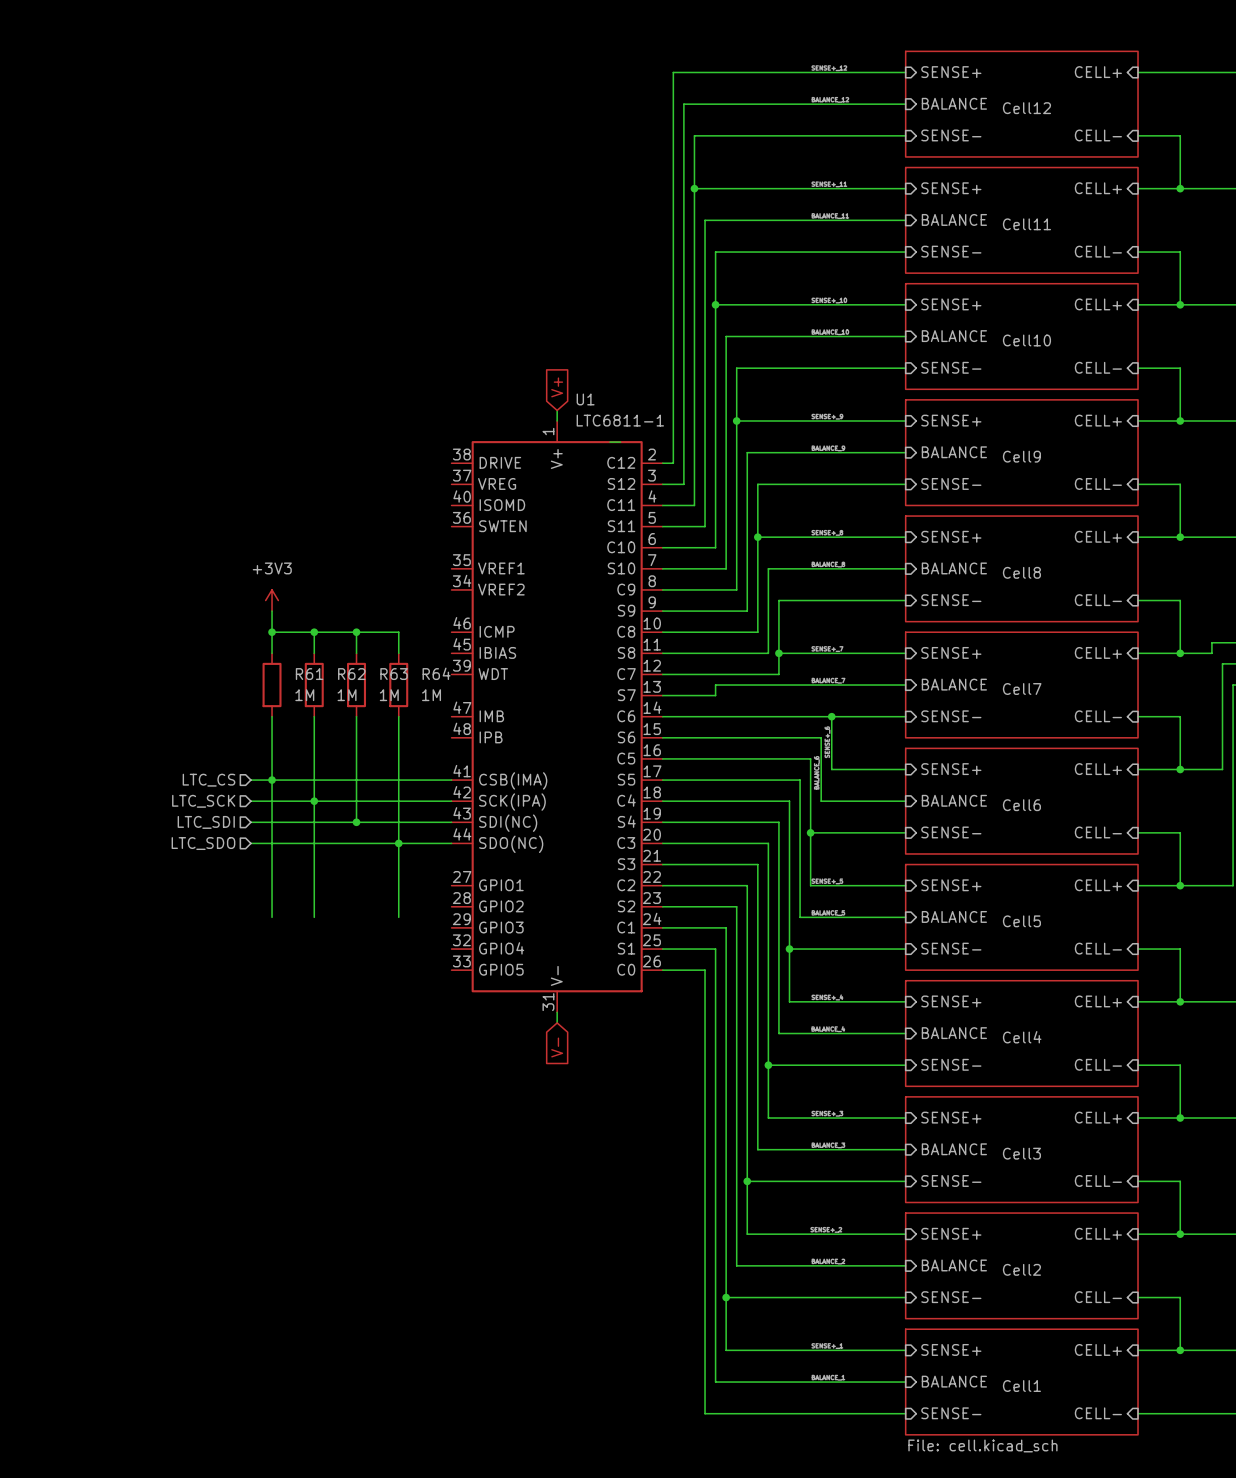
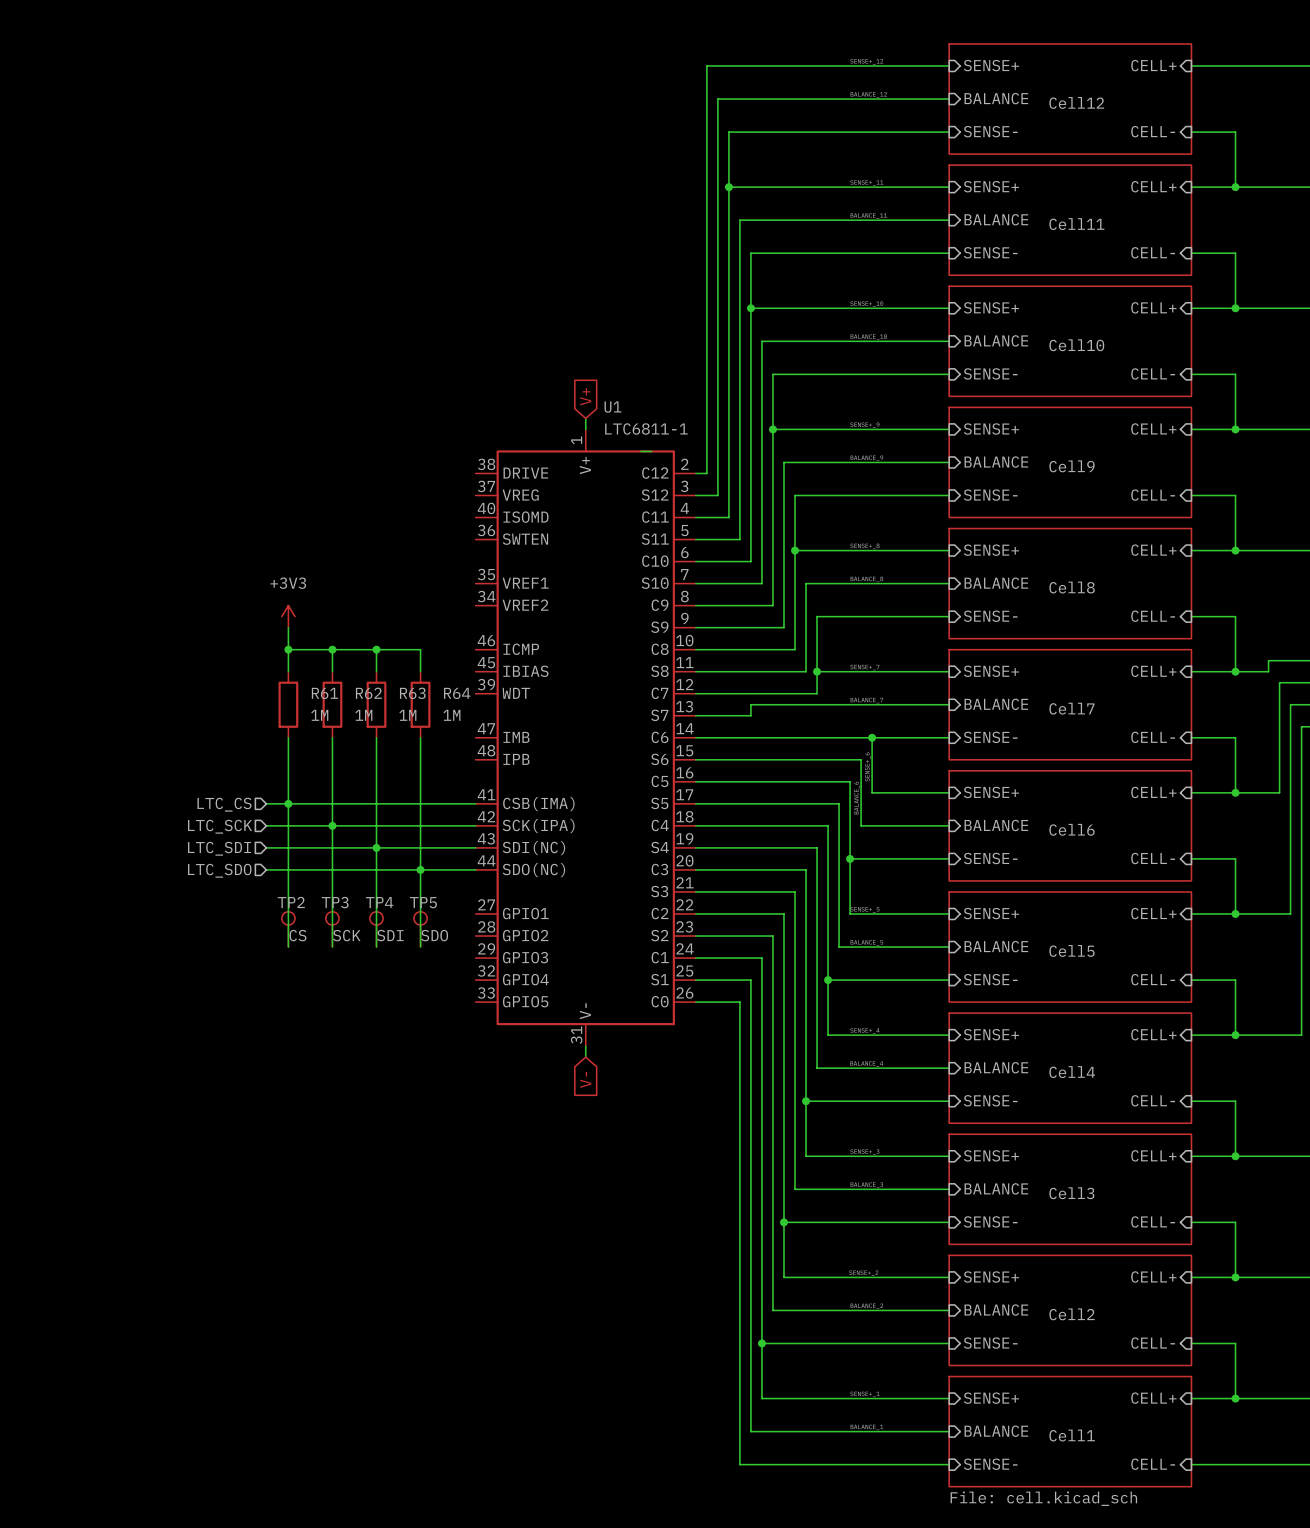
wire: none -> (376, 847) (376, 947)
TP2: none -> CS (288, 929)
TP3: none -> SCK (332, 929)
TP4: none -> SDI (376, 929)
TP5: none -> SDO (420, 929)

